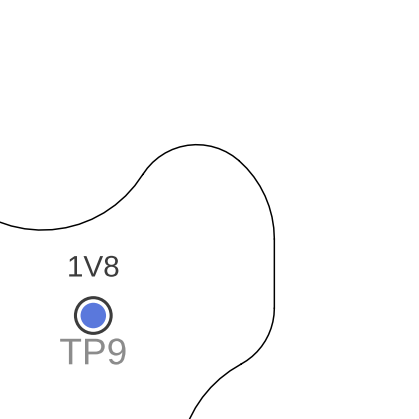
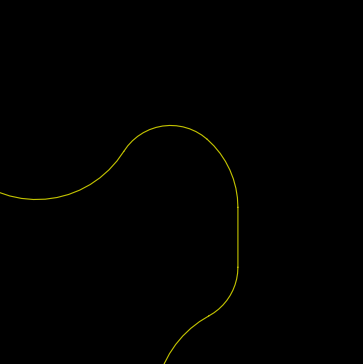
text: 1V8 (93, 266) -> none
TP9: (93, 315) -> none

